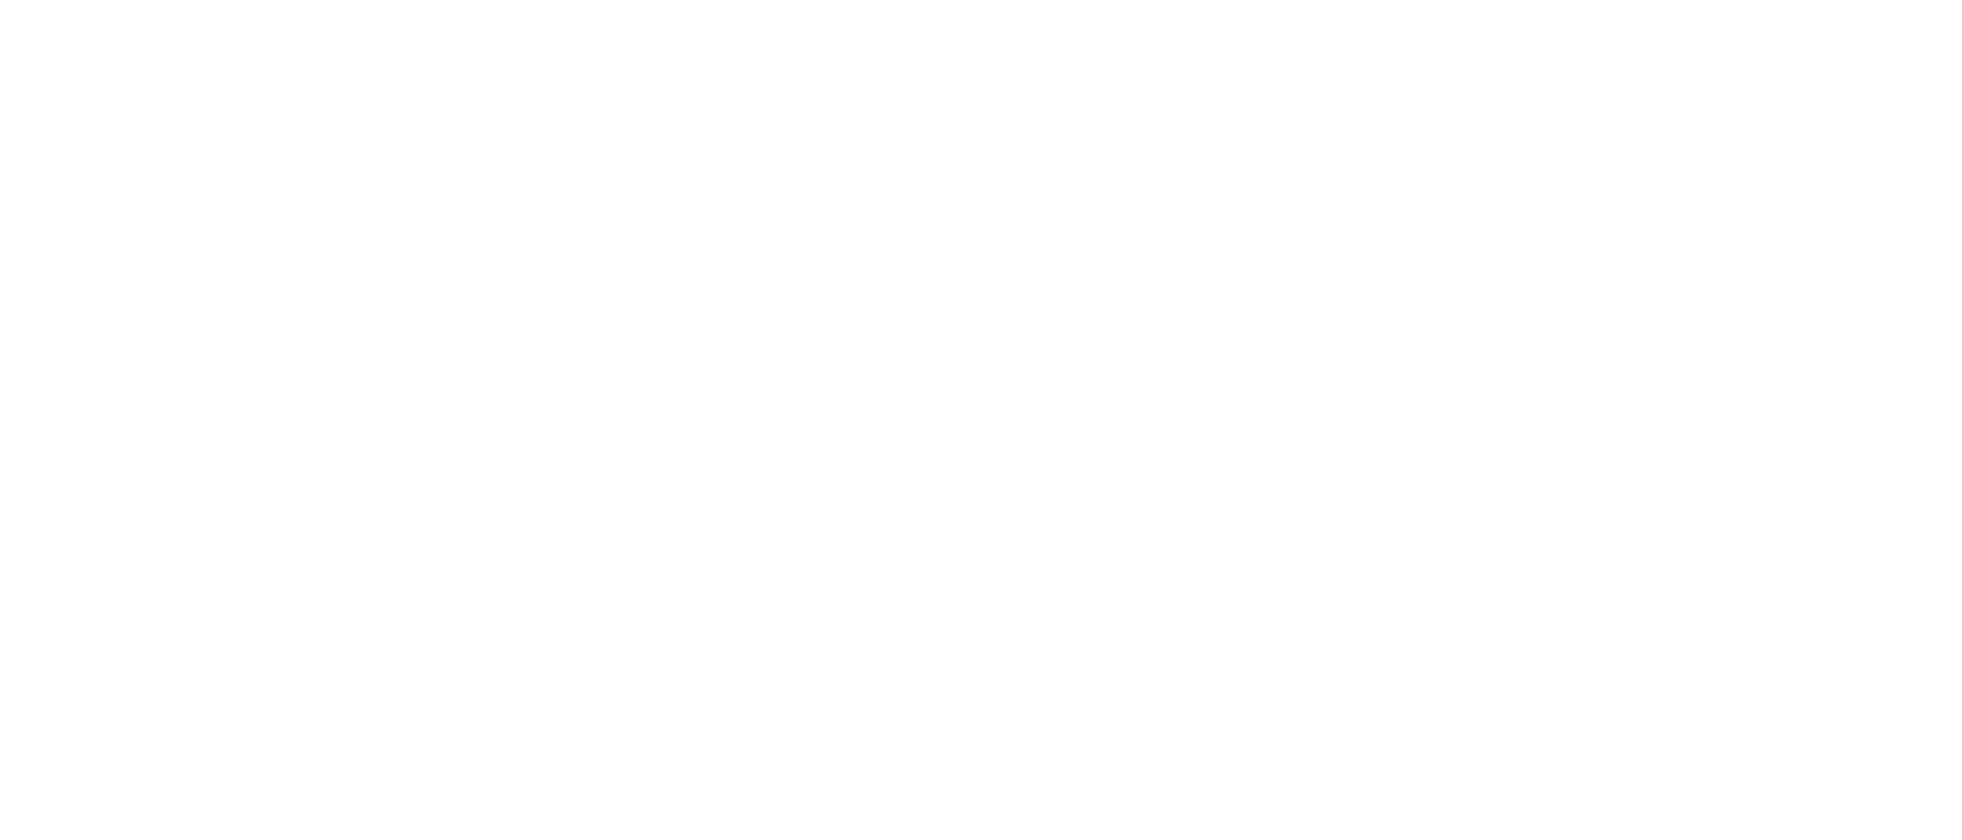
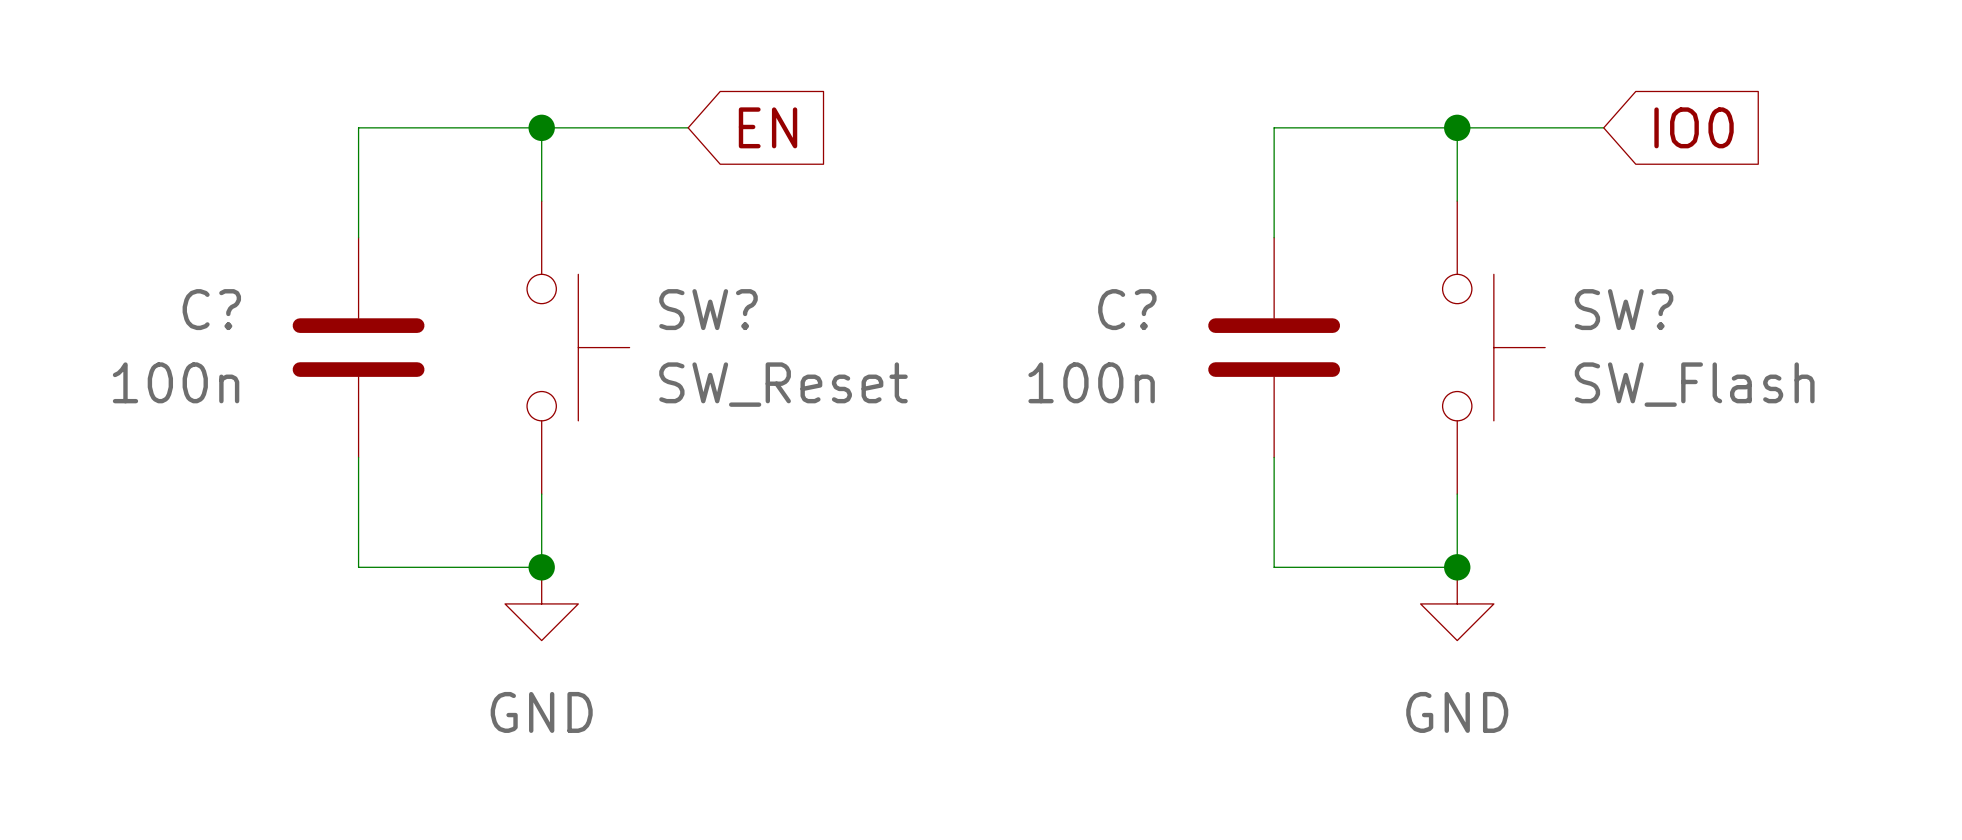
wire: none -> (541, 127) (541, 201)
junction: none -> (541, 127)
wire: none -> (688, 127) (358, 127) (358, 237)
global label: none -> EN (768, 127)
wire: none -> (1457, 127) (1457, 201)
junction: none -> (1457, 127)
wire: none -> (1603, 127) (1274, 127) (1274, 237)
global label: none -> IO0 (1694, 127)
C?: none -> 100n (358, 347)
SW?: none -> SW_Reset (578, 347)
C?: none -> 100n (1274, 347)
SW?: none -> SW_Flash (1493, 347)
wire: none -> (358, 457) (358, 567) (541, 567) (541, 494)
wire: none -> (1274, 457) (1274, 567) (1457, 567) (1457, 494)
junction: none -> (541, 567)
junction: none -> (1457, 567)
power symbol: none -> GND (541, 603)
power symbol: none -> GND (1457, 603)

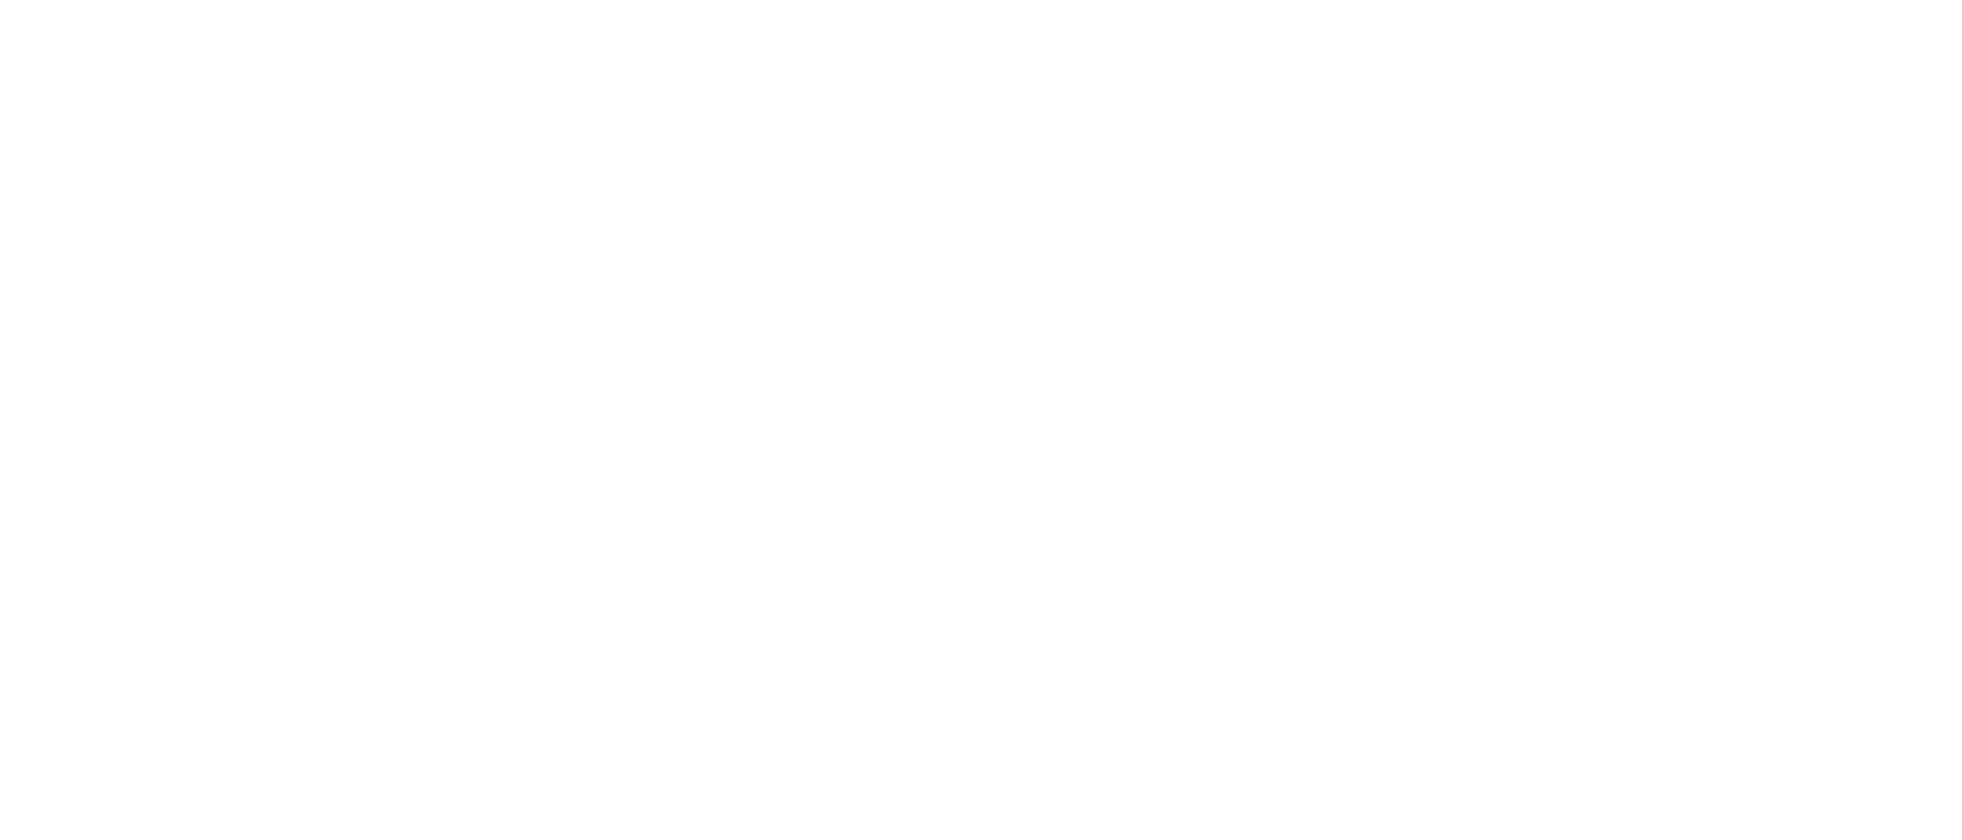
wire: (541, 127) (541, 201) -> none
junction: (541, 127) -> none
wire: (688, 127) (358, 127) (358, 237) -> none
global label: EN (768, 127) -> none
wire: (1457, 127) (1457, 201) -> none
junction: (1457, 127) -> none
wire: (1603, 127) (1274, 127) (1274, 237) -> none
global label: IO0 (1694, 127) -> none
C?: 100n (358, 347) -> none
SW?: SW_Reset (578, 347) -> none
C?: 100n (1274, 347) -> none
SW?: SW_Flash (1493, 347) -> none
wire: (358, 457) (358, 567) (541, 567) (541, 494) -> none
wire: (1274, 457) (1274, 567) (1457, 567) (1457, 494) -> none
junction: (541, 567) -> none
junction: (1457, 567) -> none
power symbol: GND (541, 603) -> none
power symbol: GND (1457, 603) -> none

